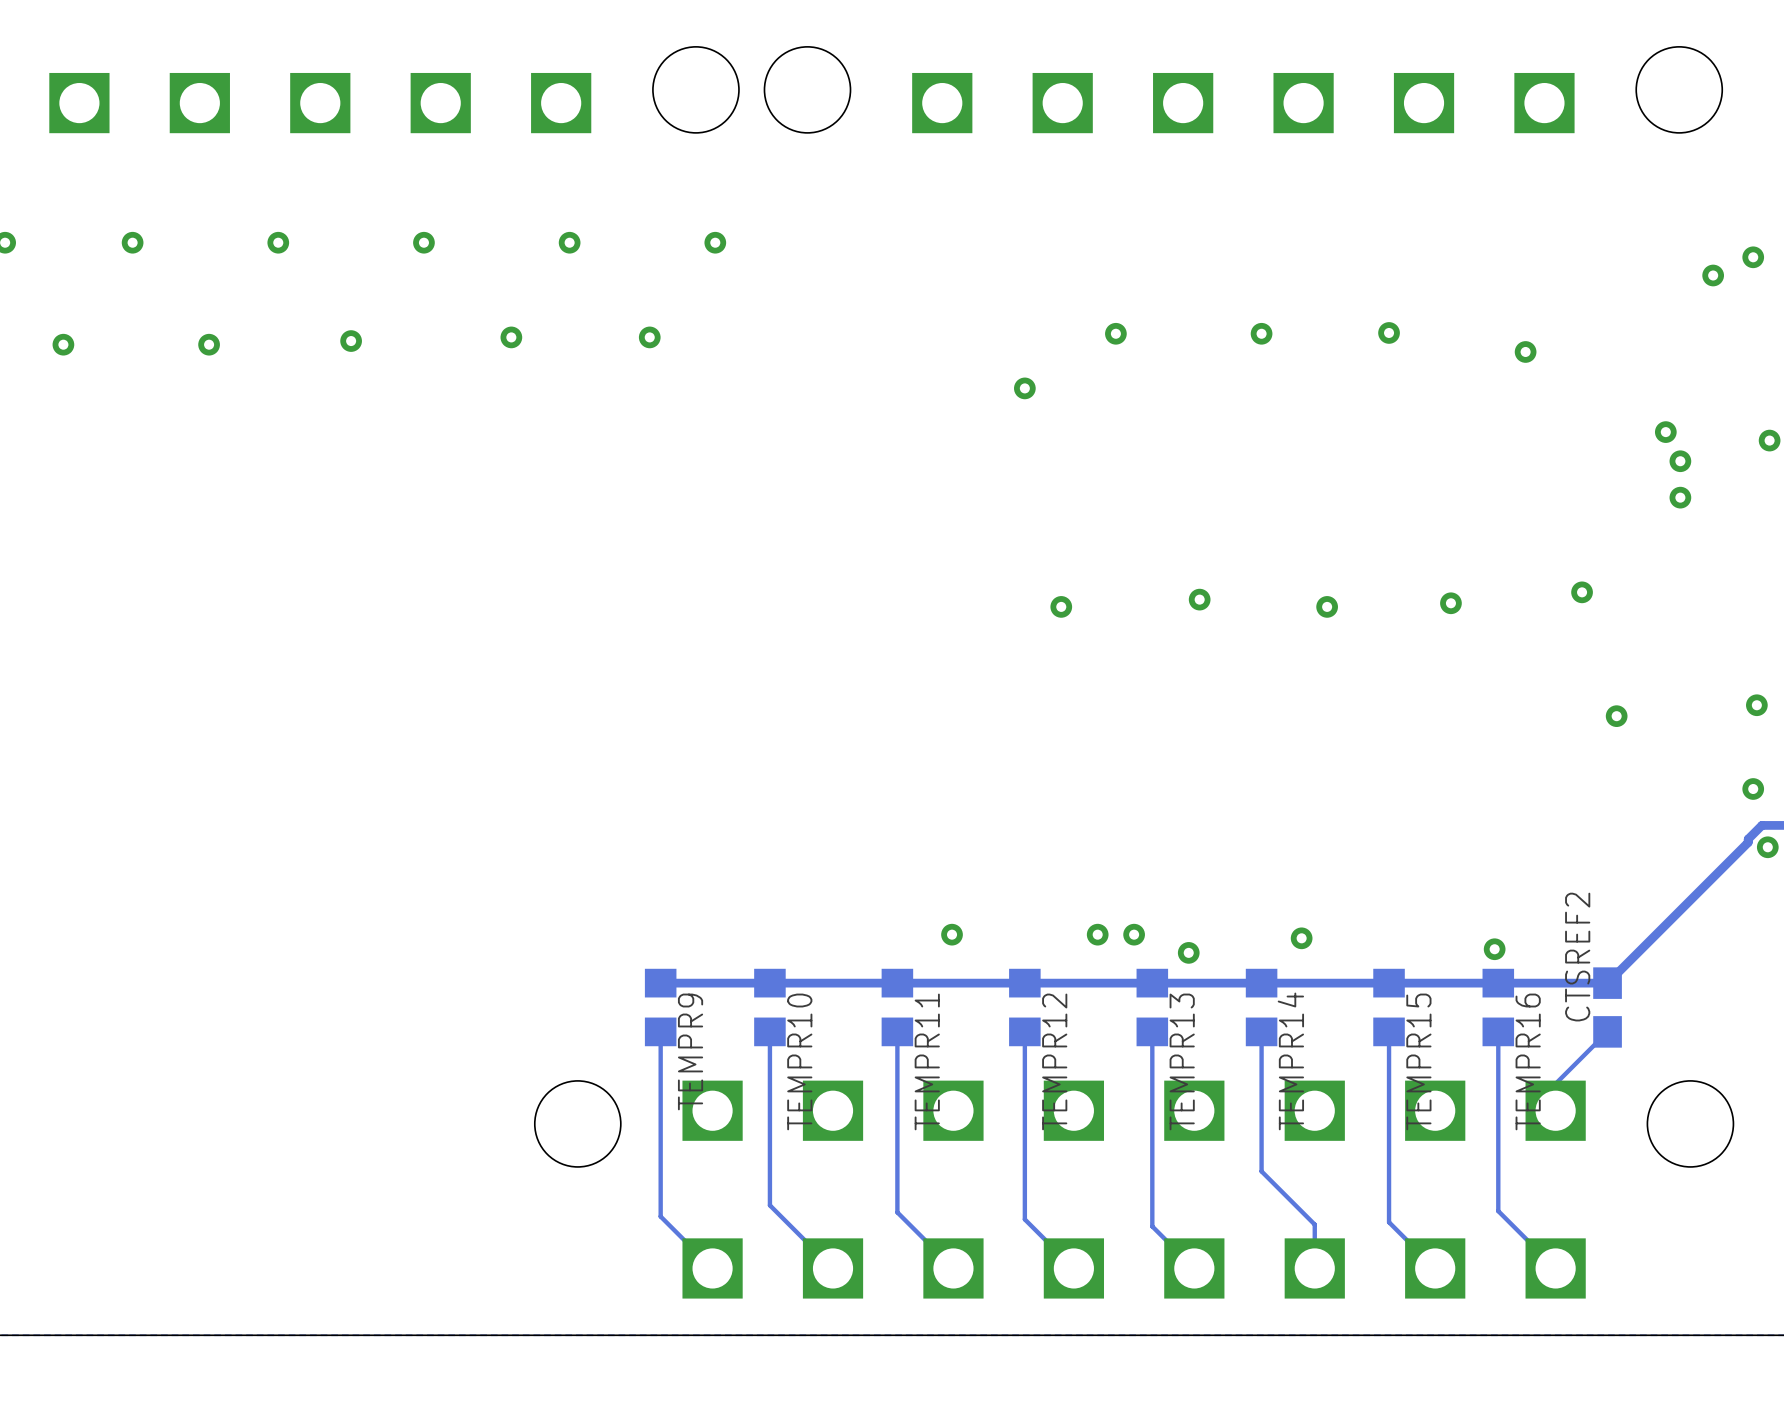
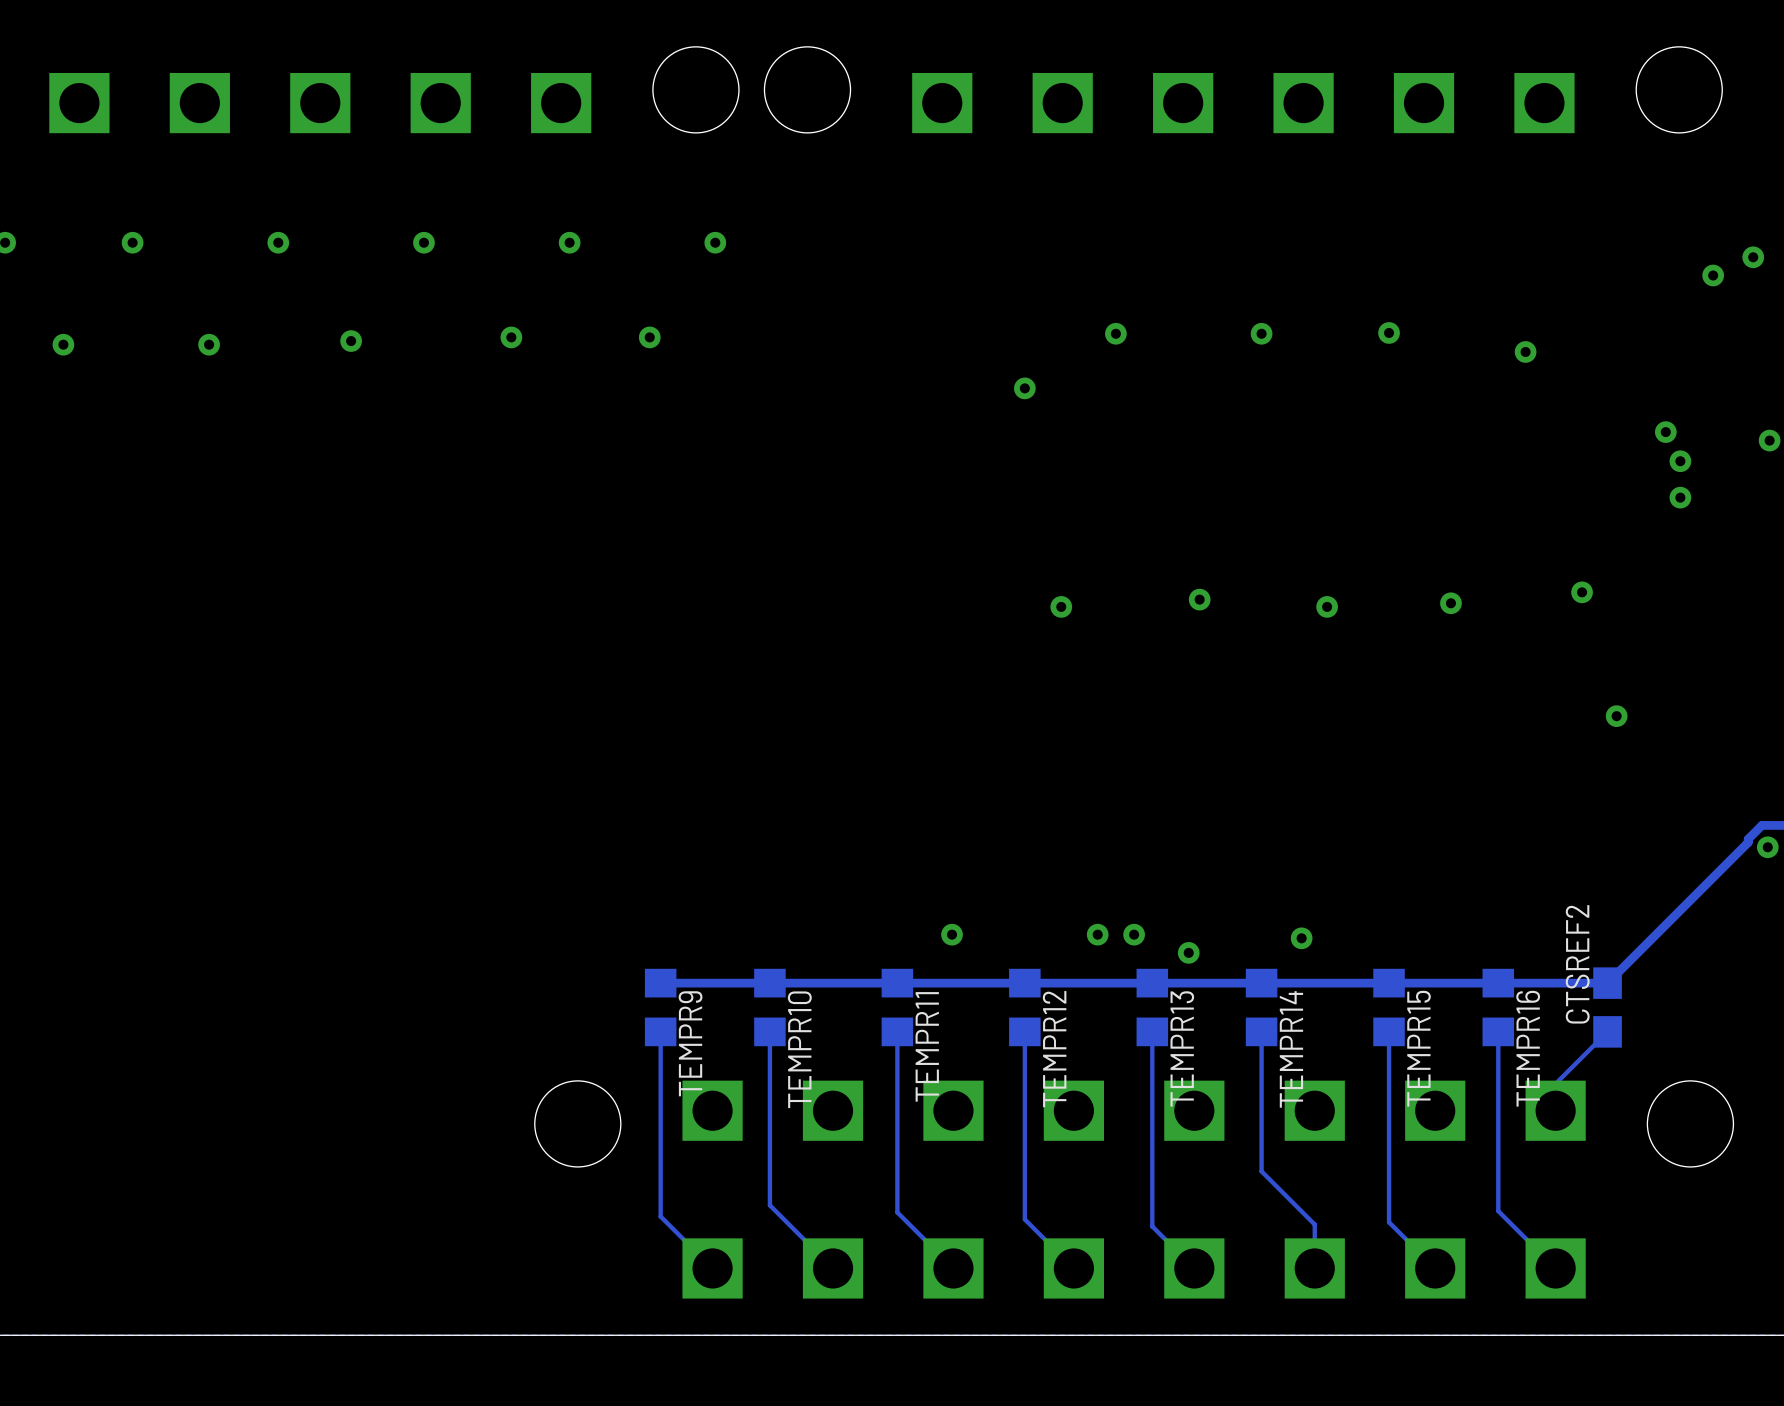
via: (1756, 705) -> none
via: (1753, 789) -> none
via: (1494, 949) -> none

